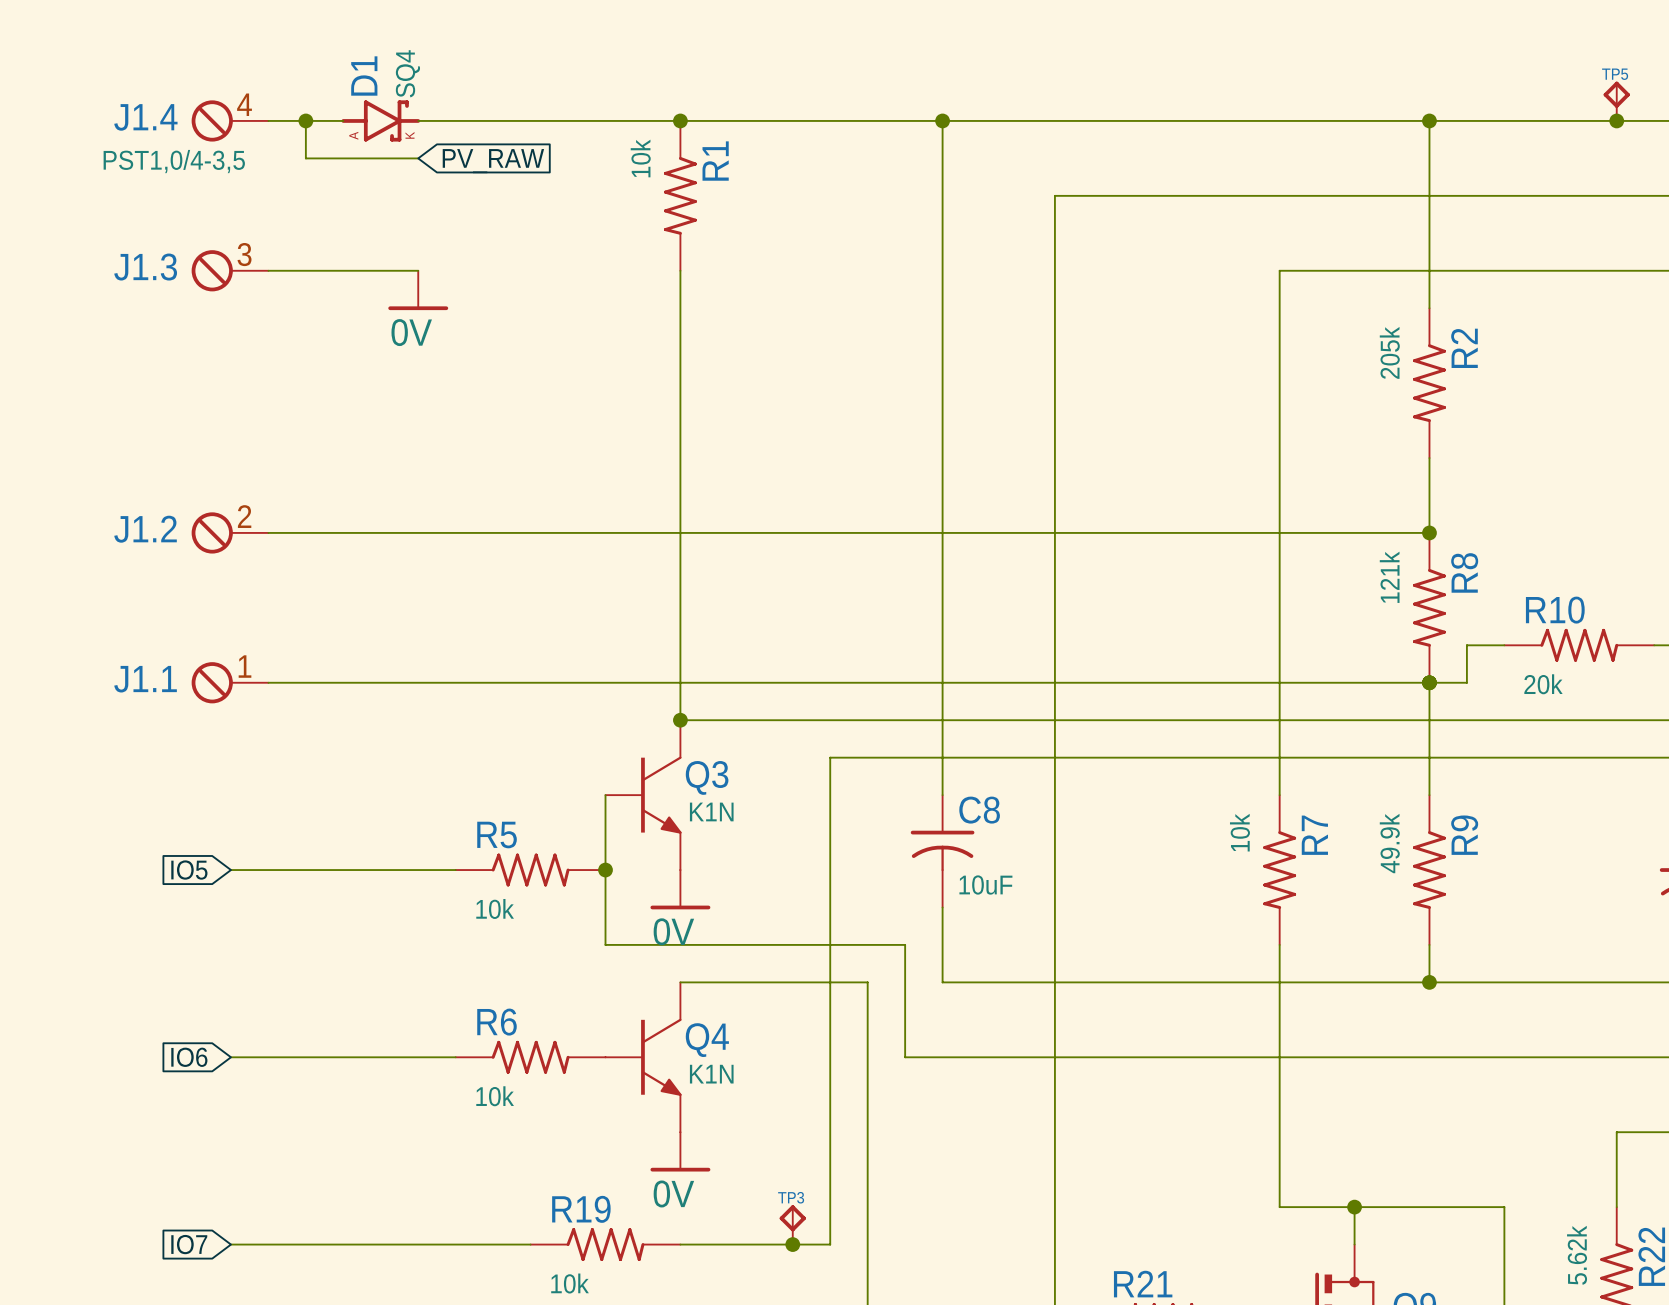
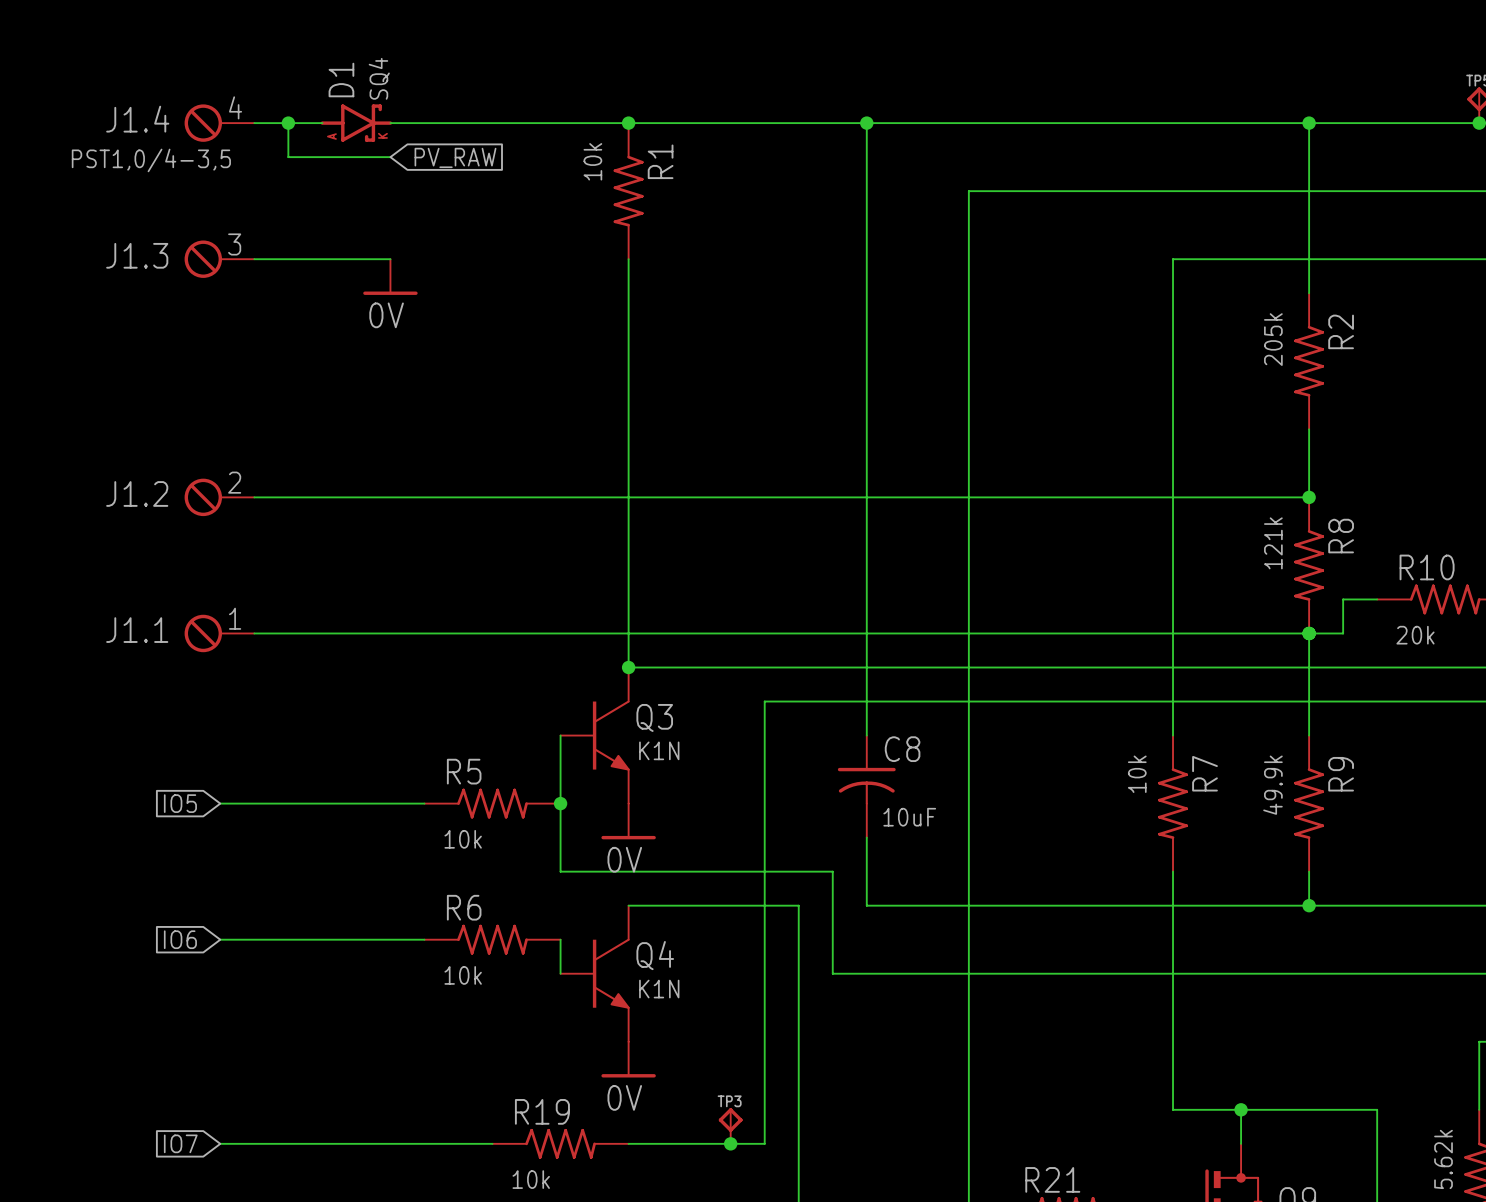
wire: none -> (560, 939) (560, 973)
global label position: IO6 (189, 1057) -> IO6 (180, 939)
wire: (230, 1057) (455, 1057) -> (220, 939) (424, 939)
R6 position: (530, 1057) -> (492, 939)

